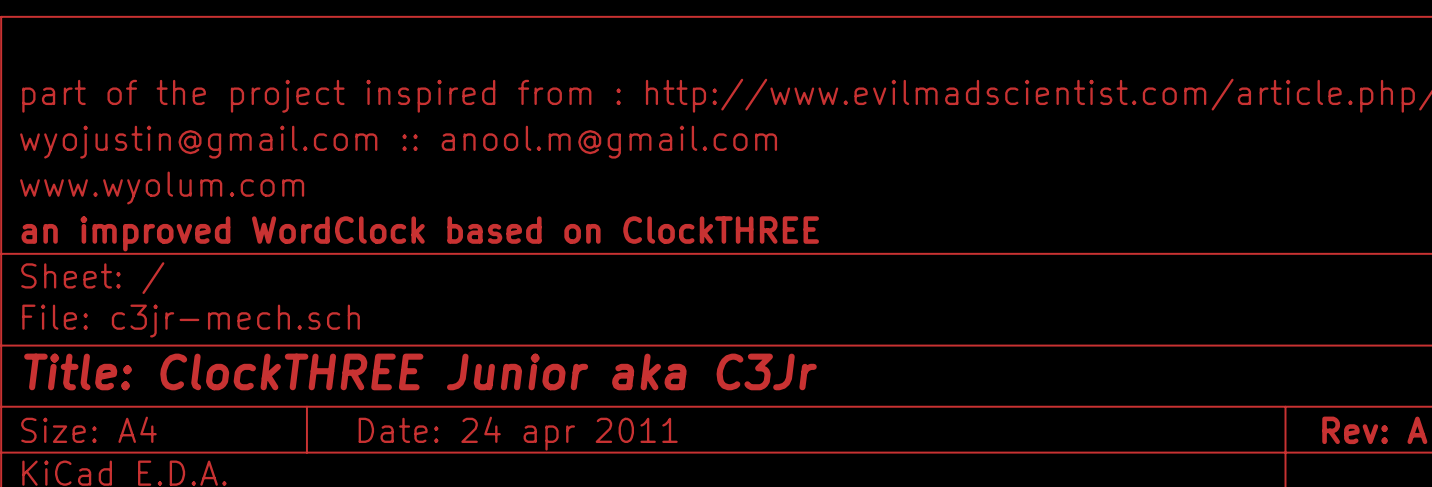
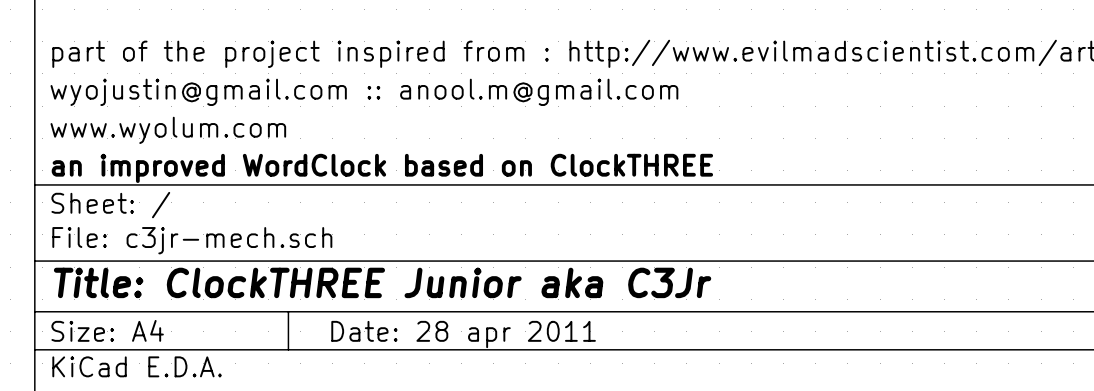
title block: Date: 24 apr 2011 (518, 433) -> Date: 28 apr 2011 (463, 334)

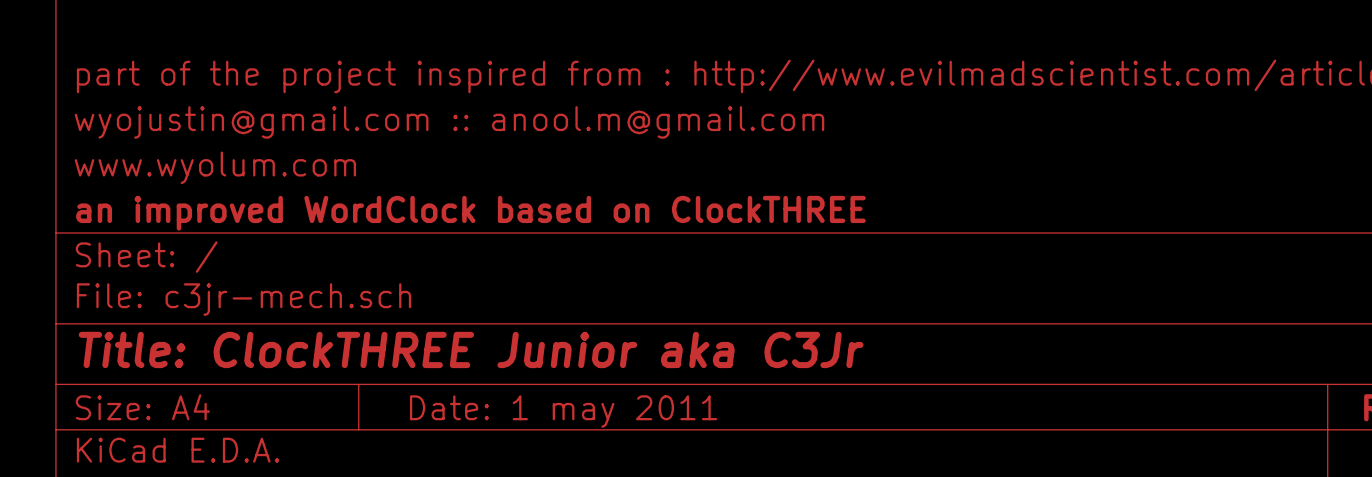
title block: Date: 28 apr 2011 (463, 334) -> Date: 1 may 2011 (563, 411)

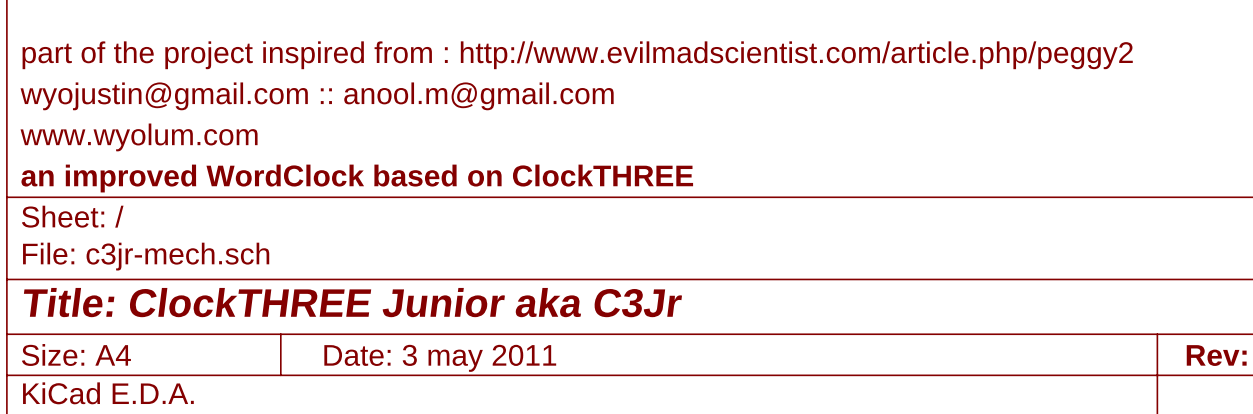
title block: Date: 1 may 2011 (563, 411) -> Date: 3 may 2011 (440, 358)

